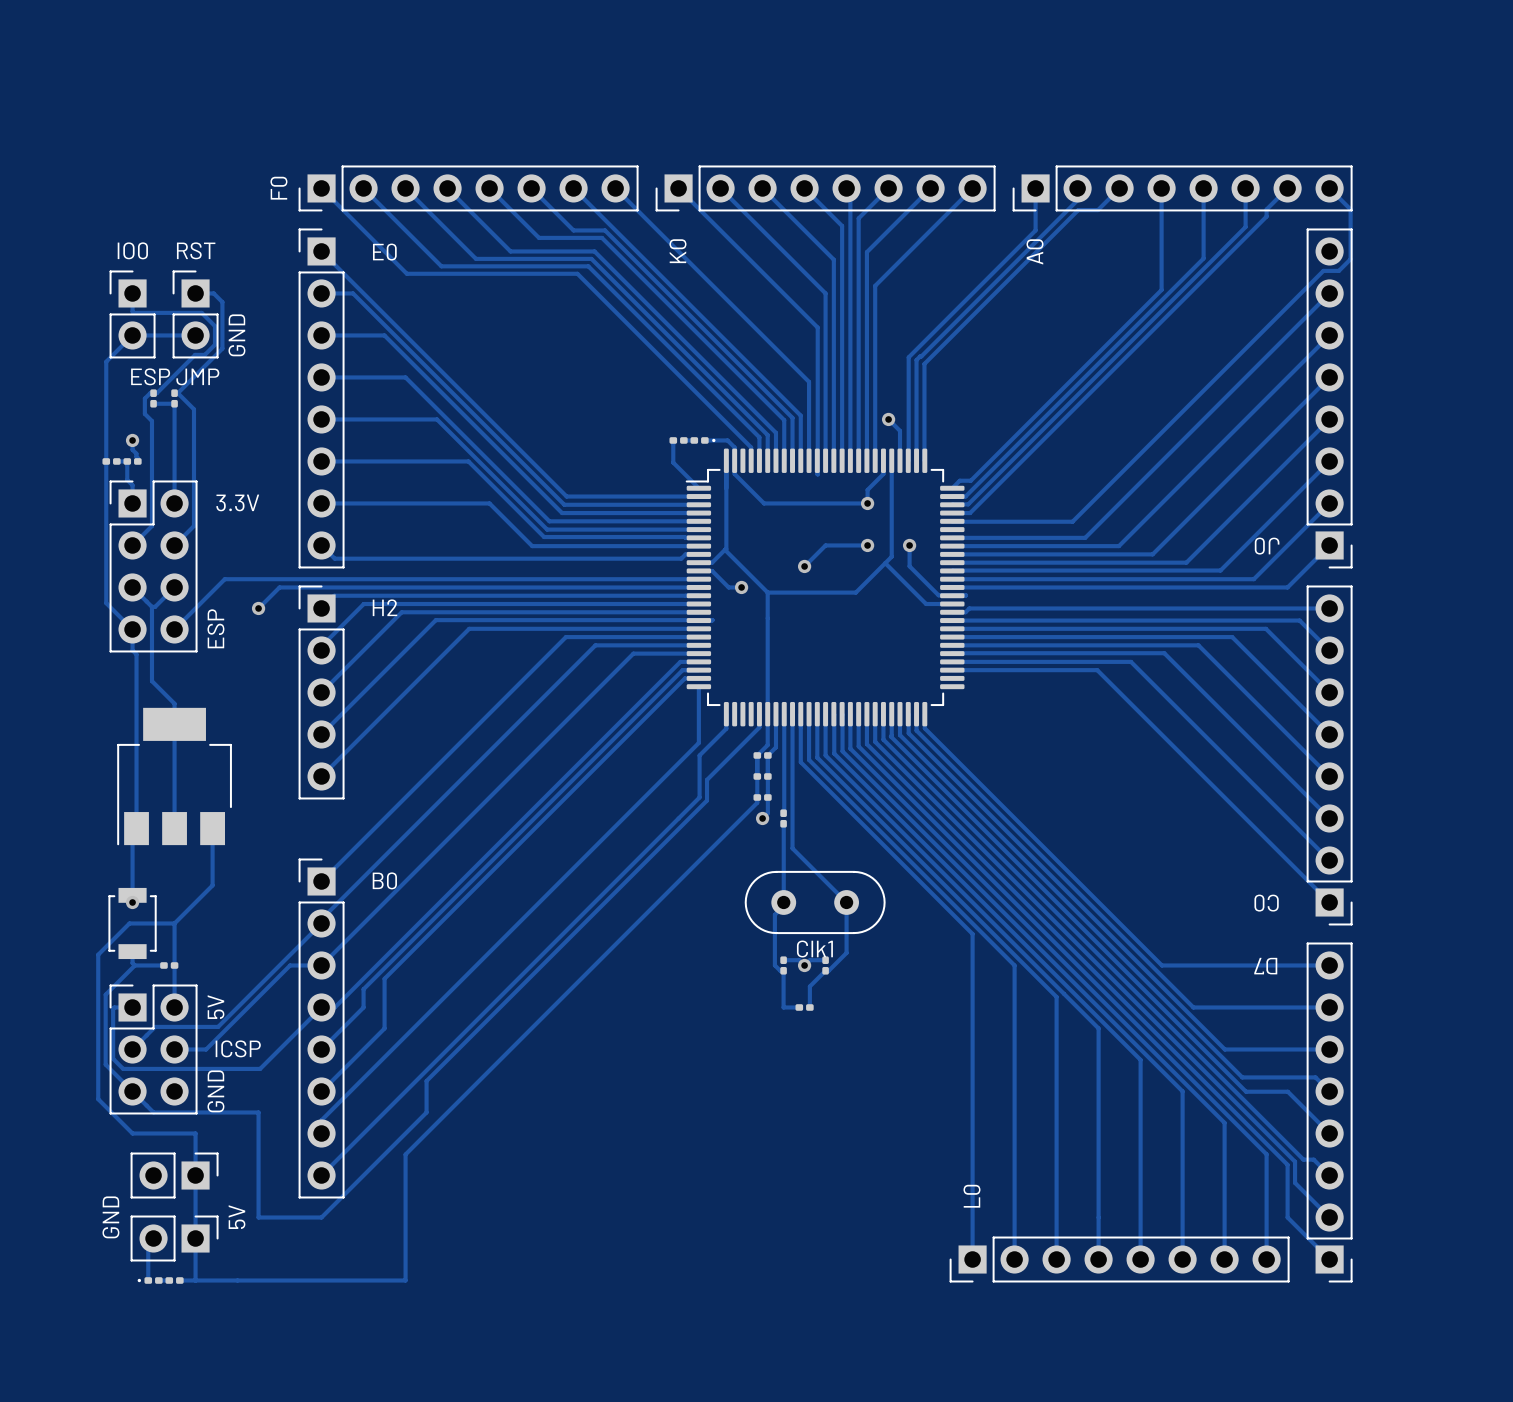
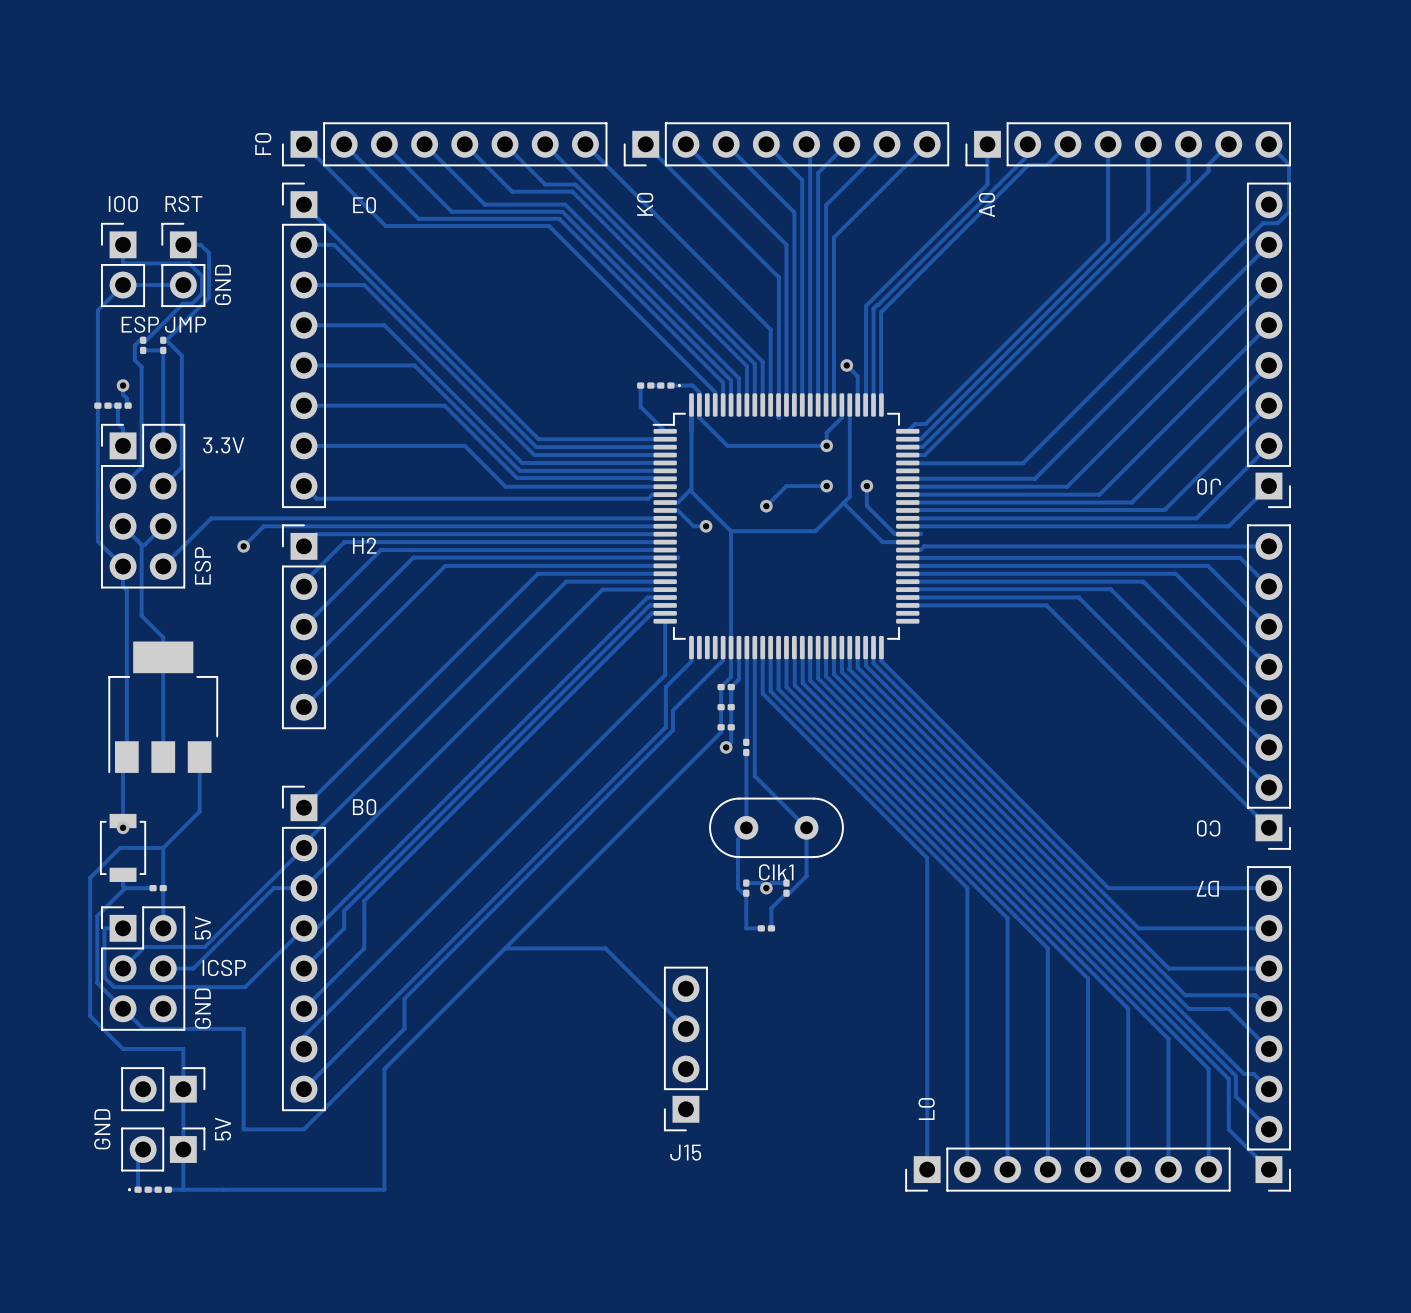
track: none -> (505, 948) (605, 948) (685, 1028)
J15: none -> (685, 1048)

